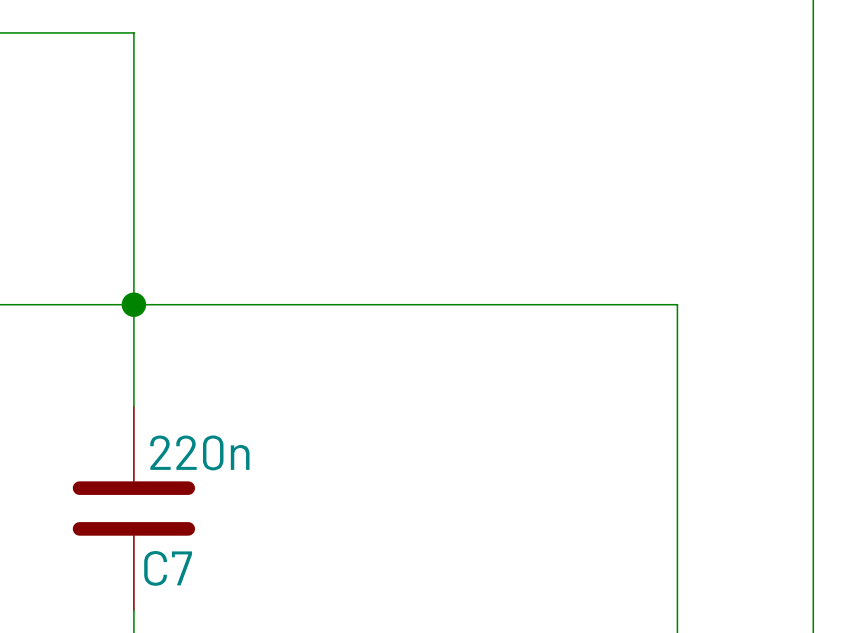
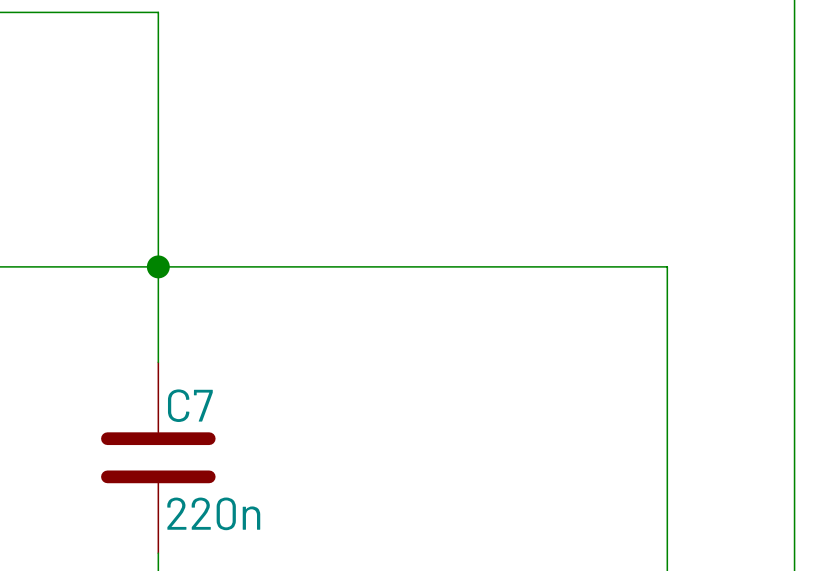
C7 value position: 220n (199, 452) -> 220n (213, 513)
C7 name position: C7 (168, 568) -> C7 (190, 405)

